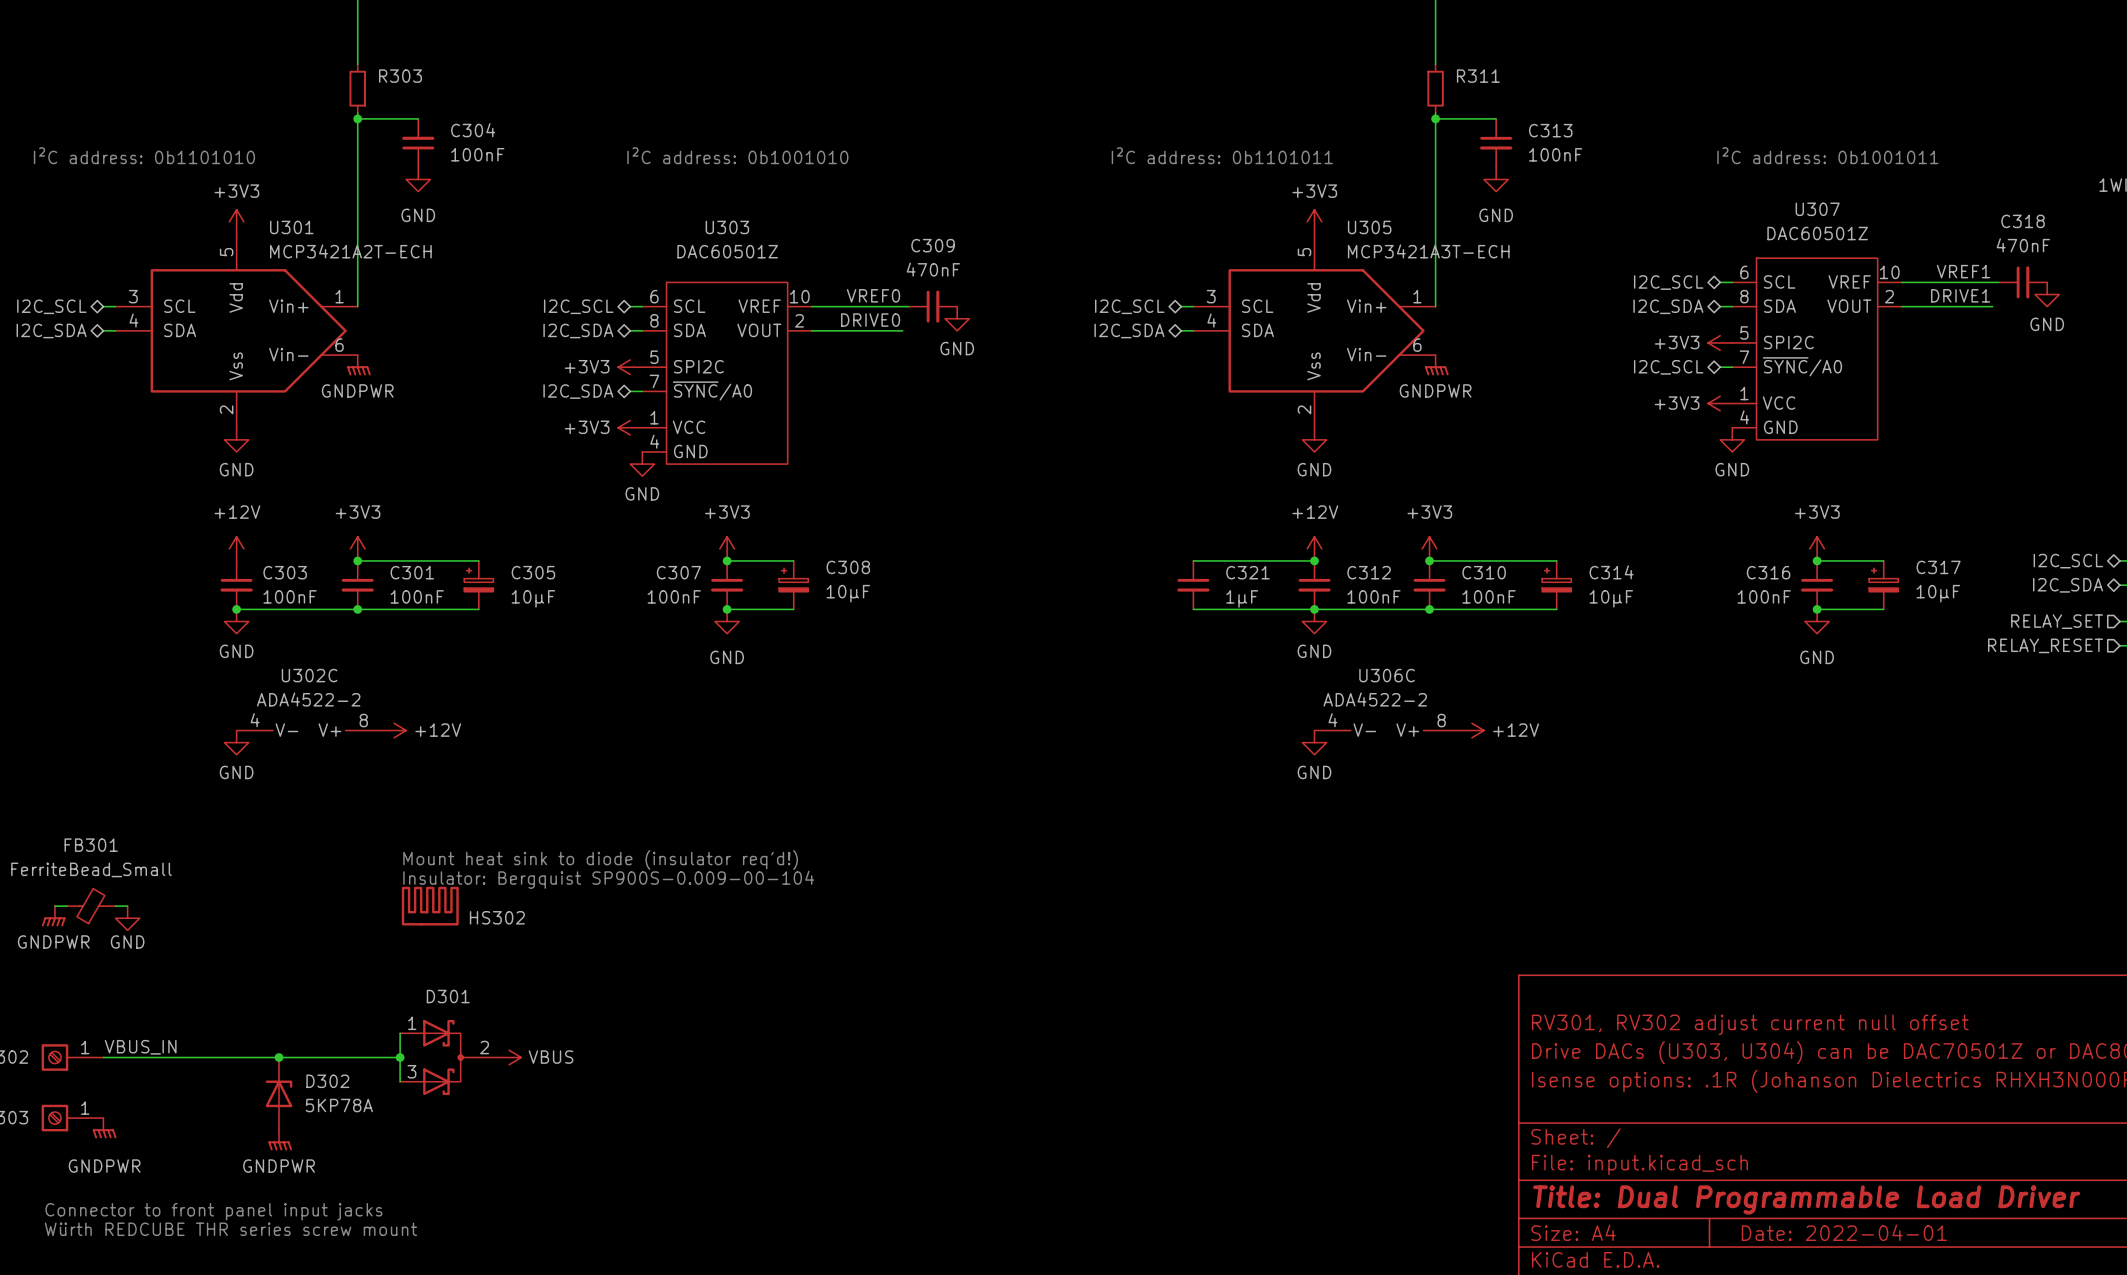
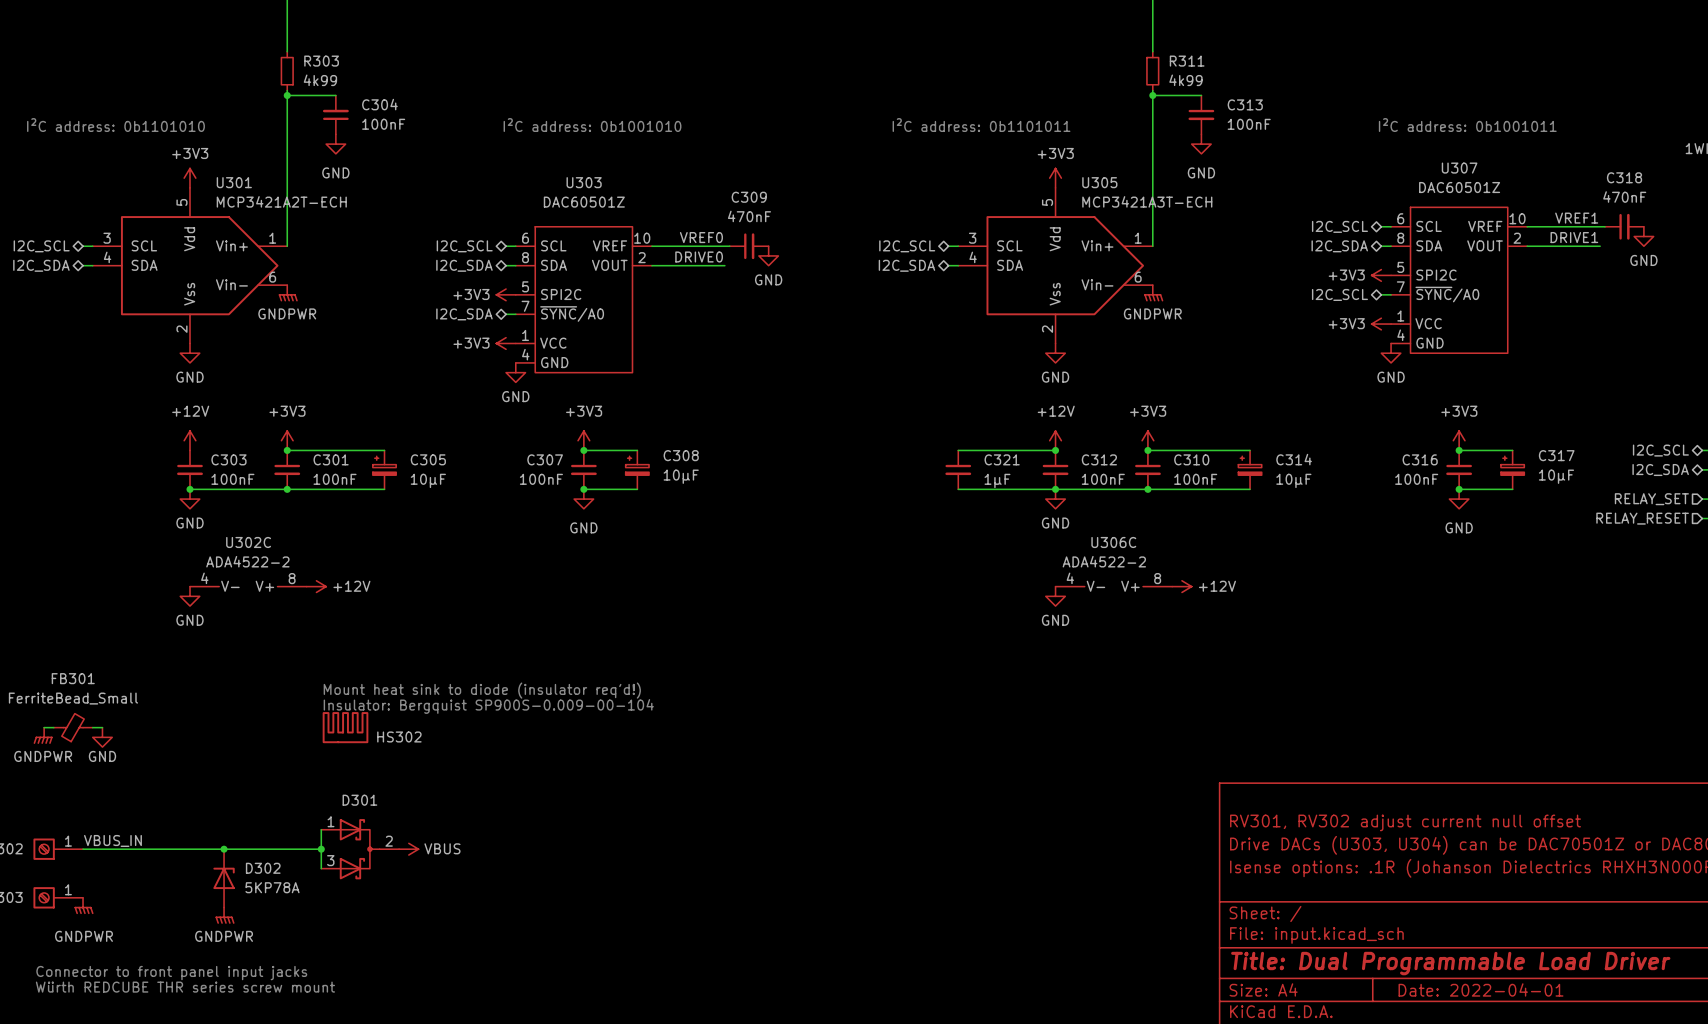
R303 value: none -> 4k99 (320, 80)
R311 value: none -> 4k99 (1185, 80)

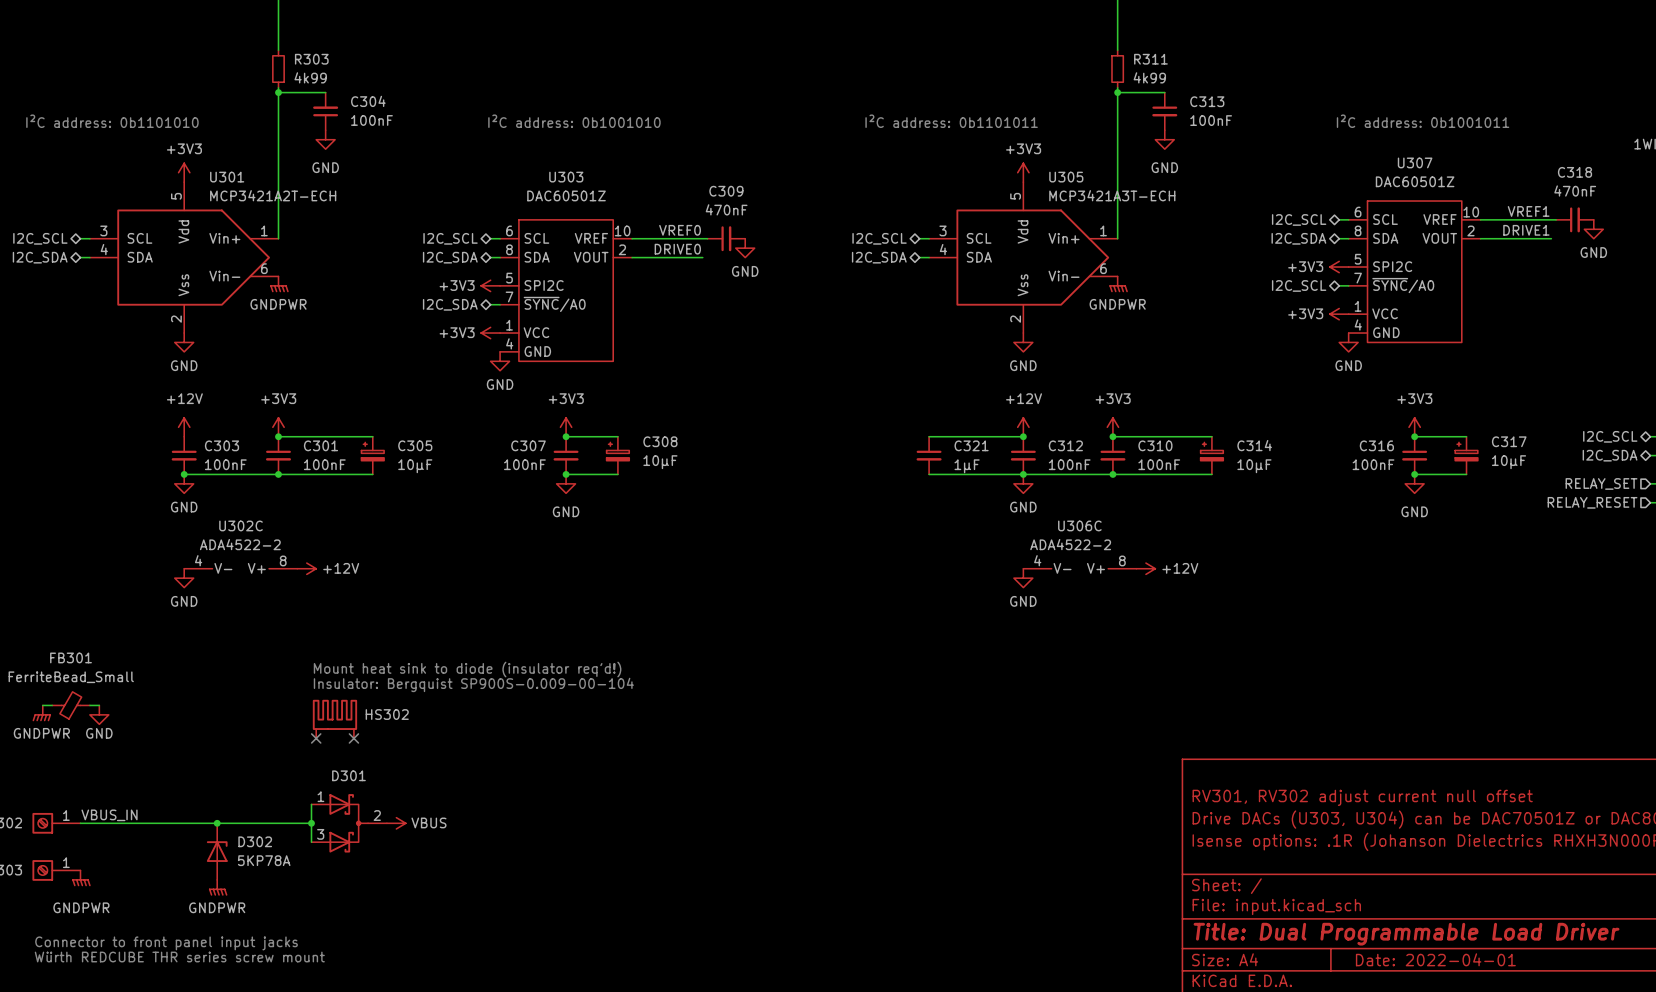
HS302 symbol: [322, 712, 369, 744] -> [312, 699, 358, 739]
no-connect mark: none -> (316, 738)
no-connect mark: none -> (353, 738)

